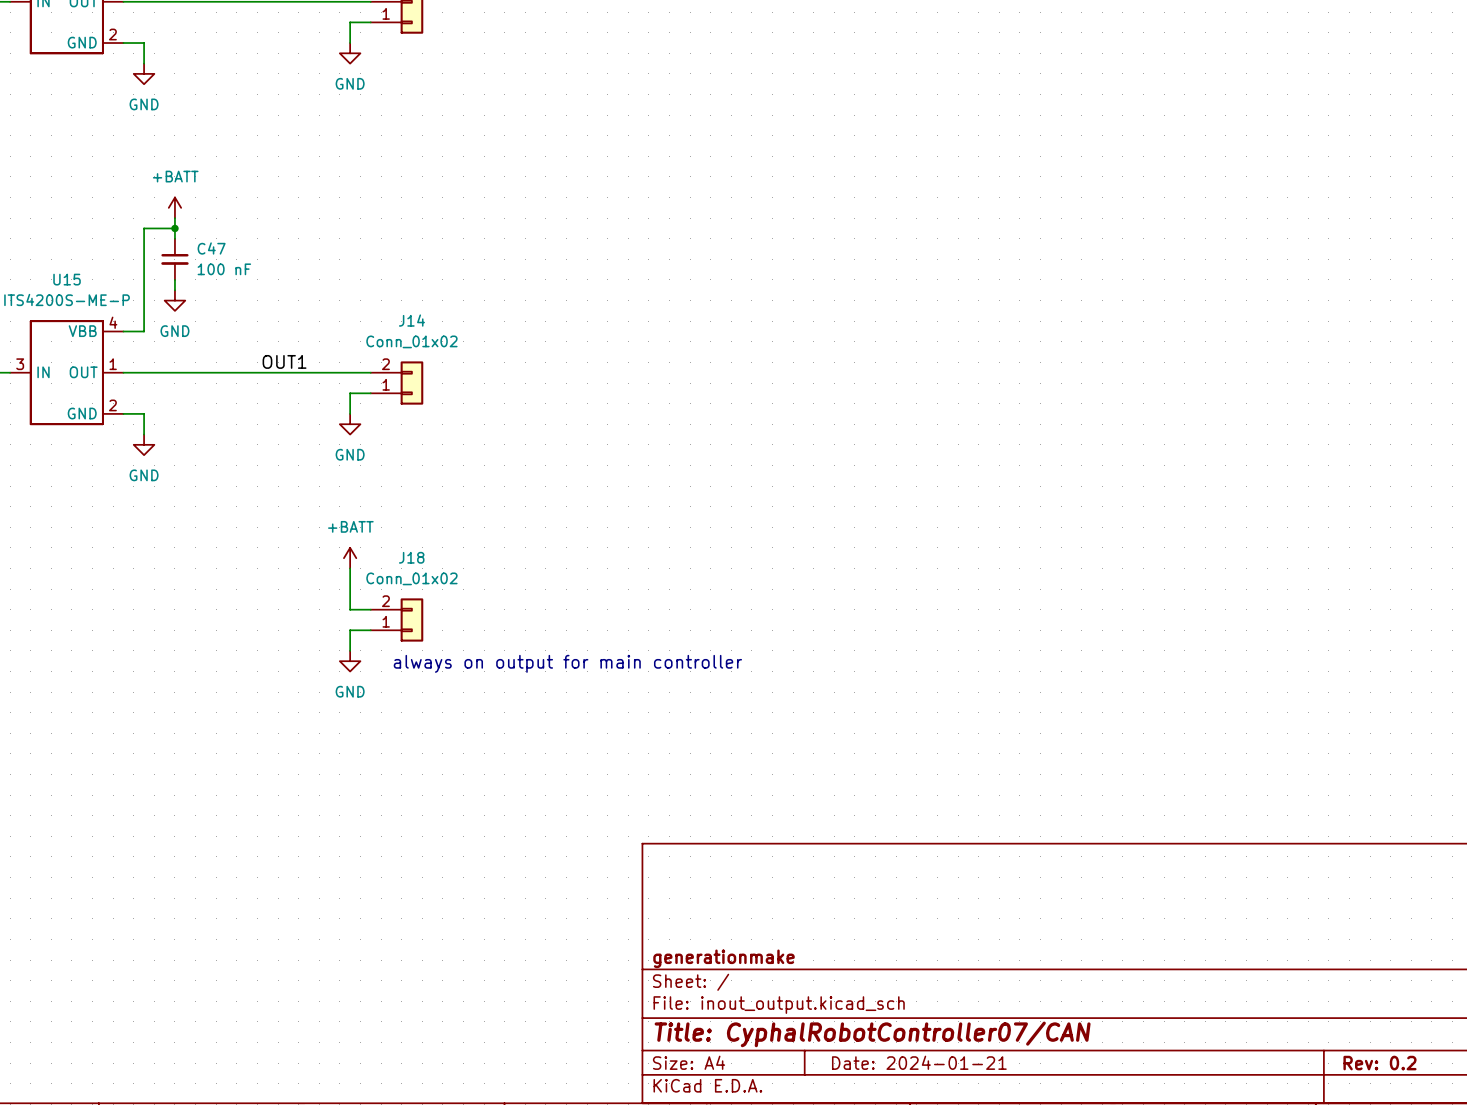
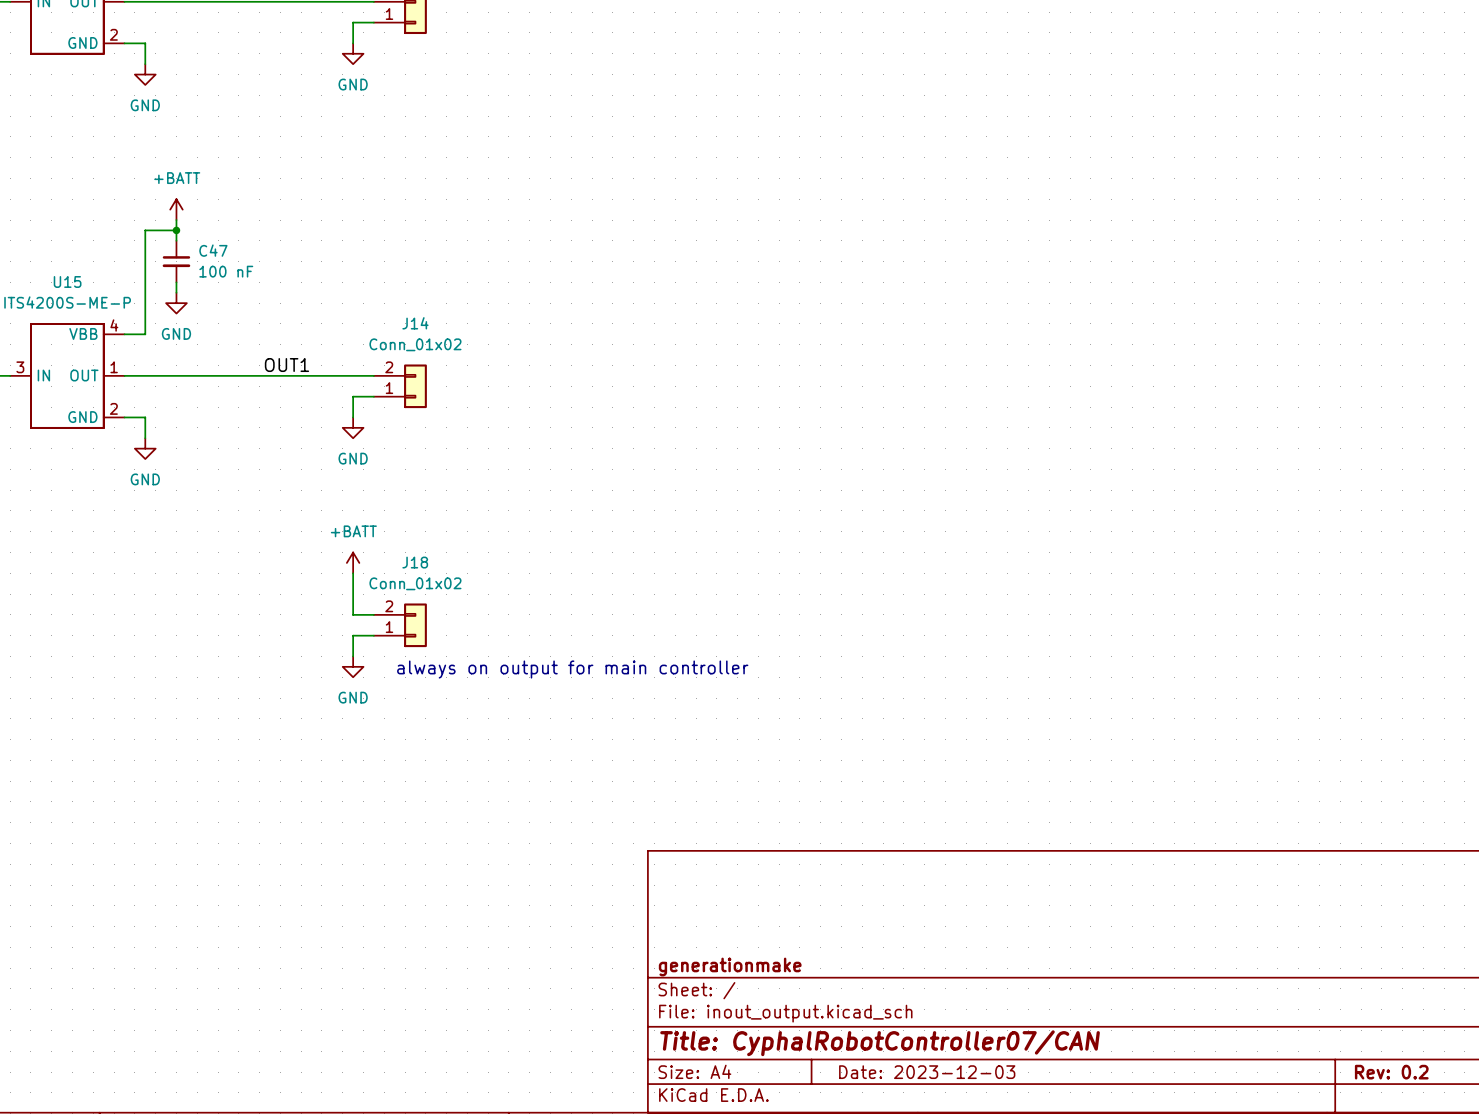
title block: Date: 2024-01-21 (919, 1062) -> Date: 2023-12-03 (927, 1072)

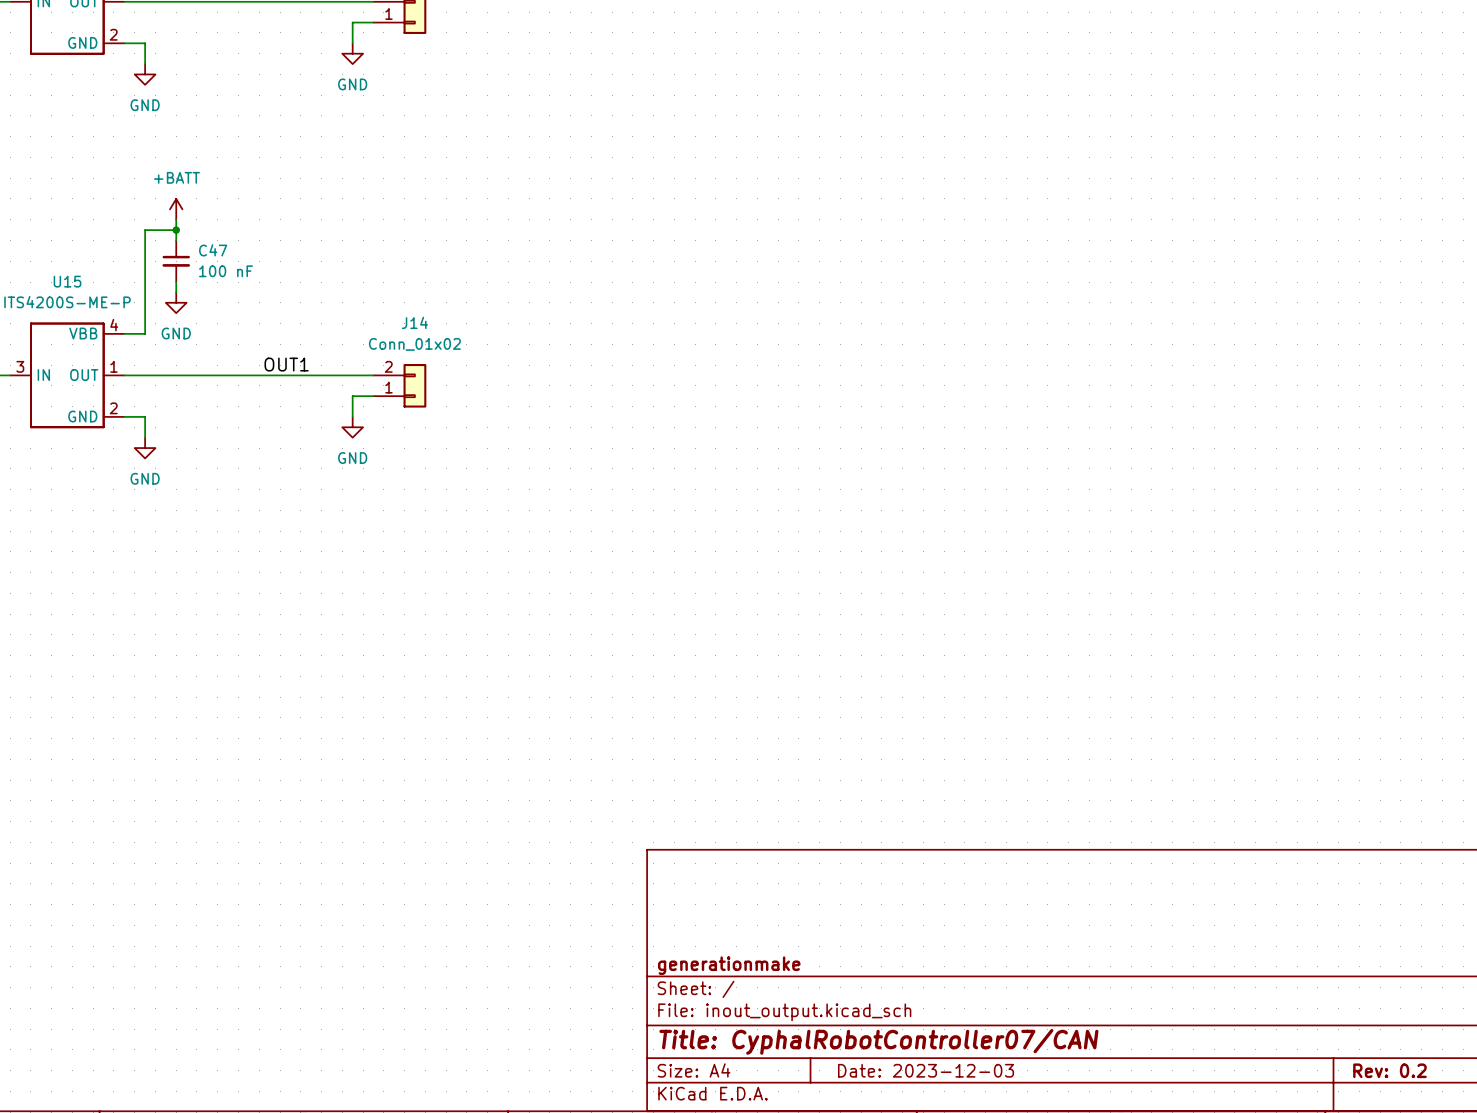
power symbol: +BATT (353, 562) -> none
wire: (353, 573) (353, 614) (373, 614) -> none
J18: Conn_01x02 (400, 625) -> none
wire: (373, 635) (353, 635) (353, 656) -> none
power symbol: GND (353, 666) -> none
text: always on output for main controller (572, 669) -> none

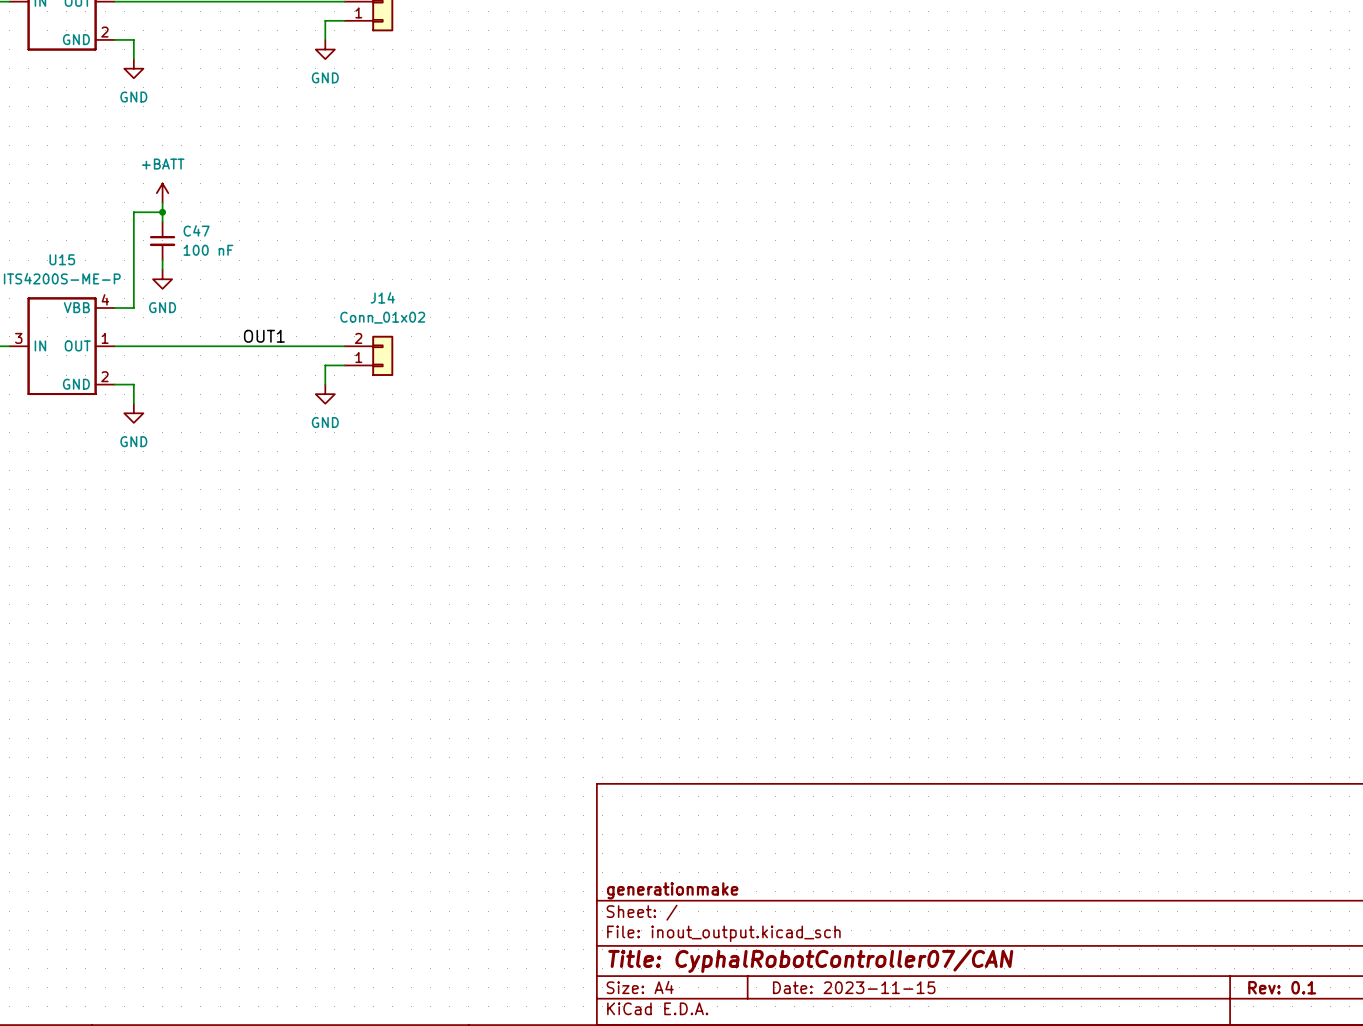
title block: Date: 2023-12-03 (926, 1070) -> Date: 2023-11-15 (854, 987)
title block: Rev: 0.2 (1389, 1070) -> Rev: 0.1 (1282, 987)

